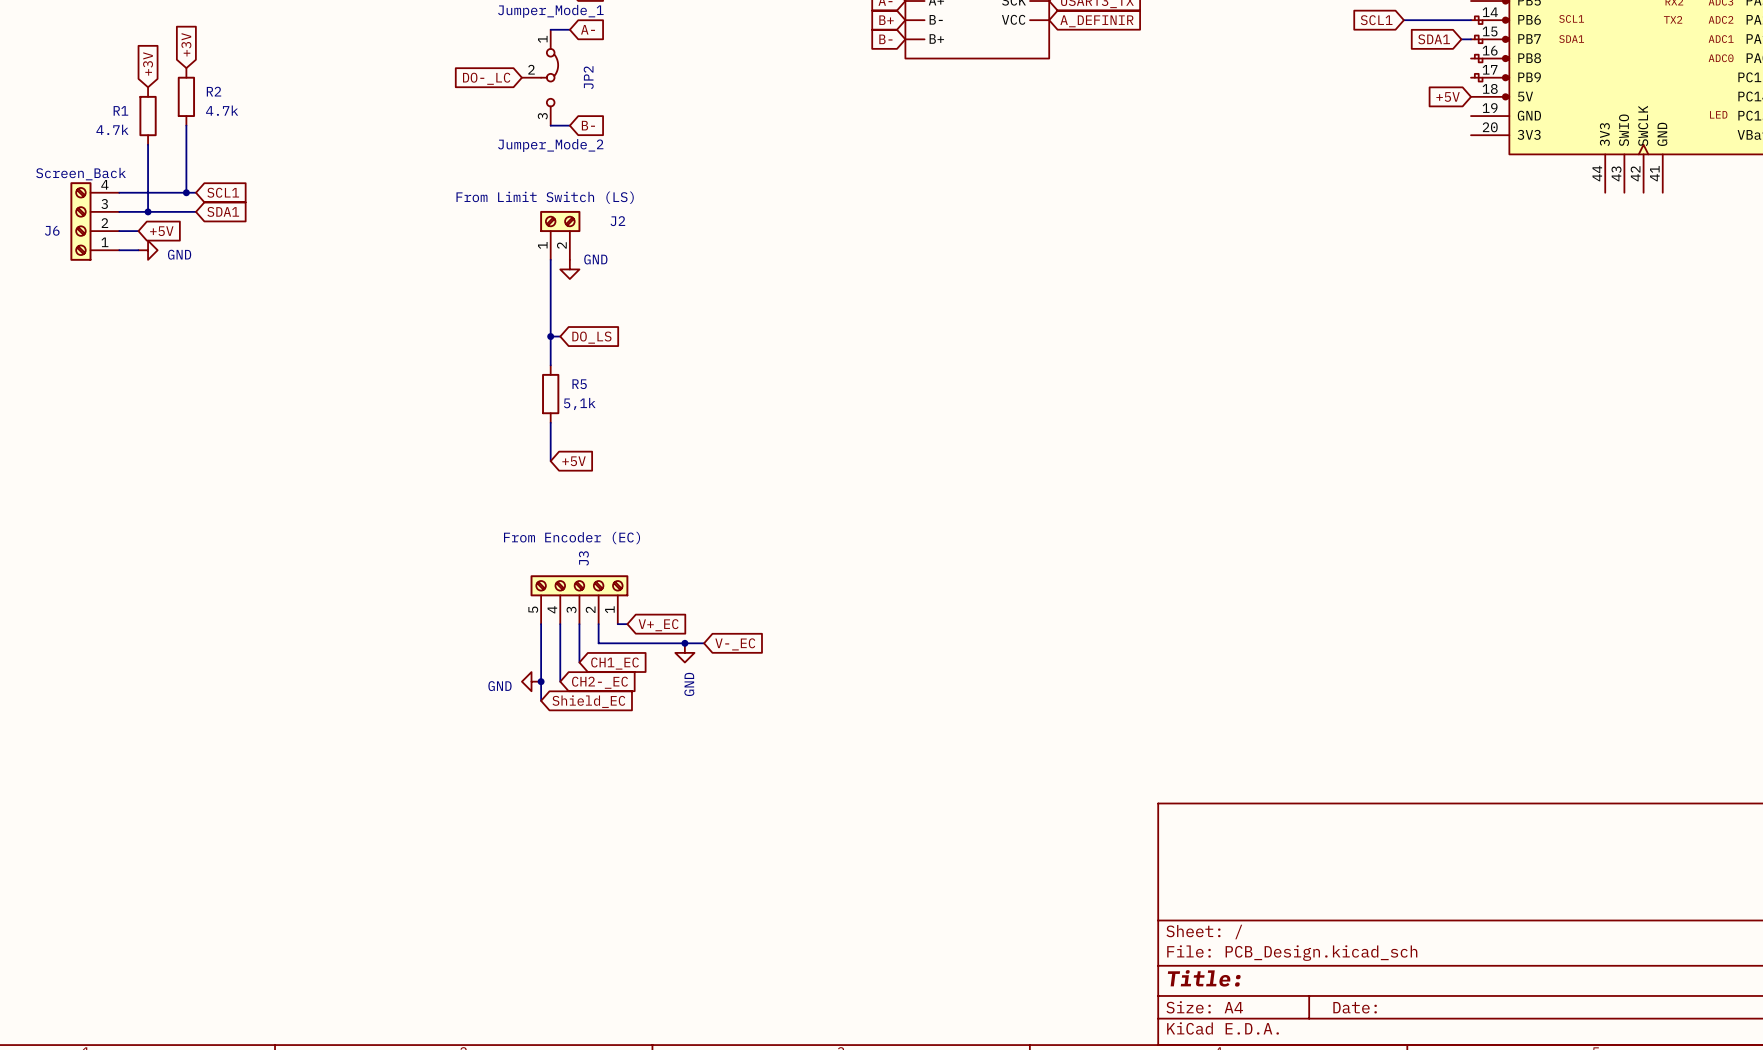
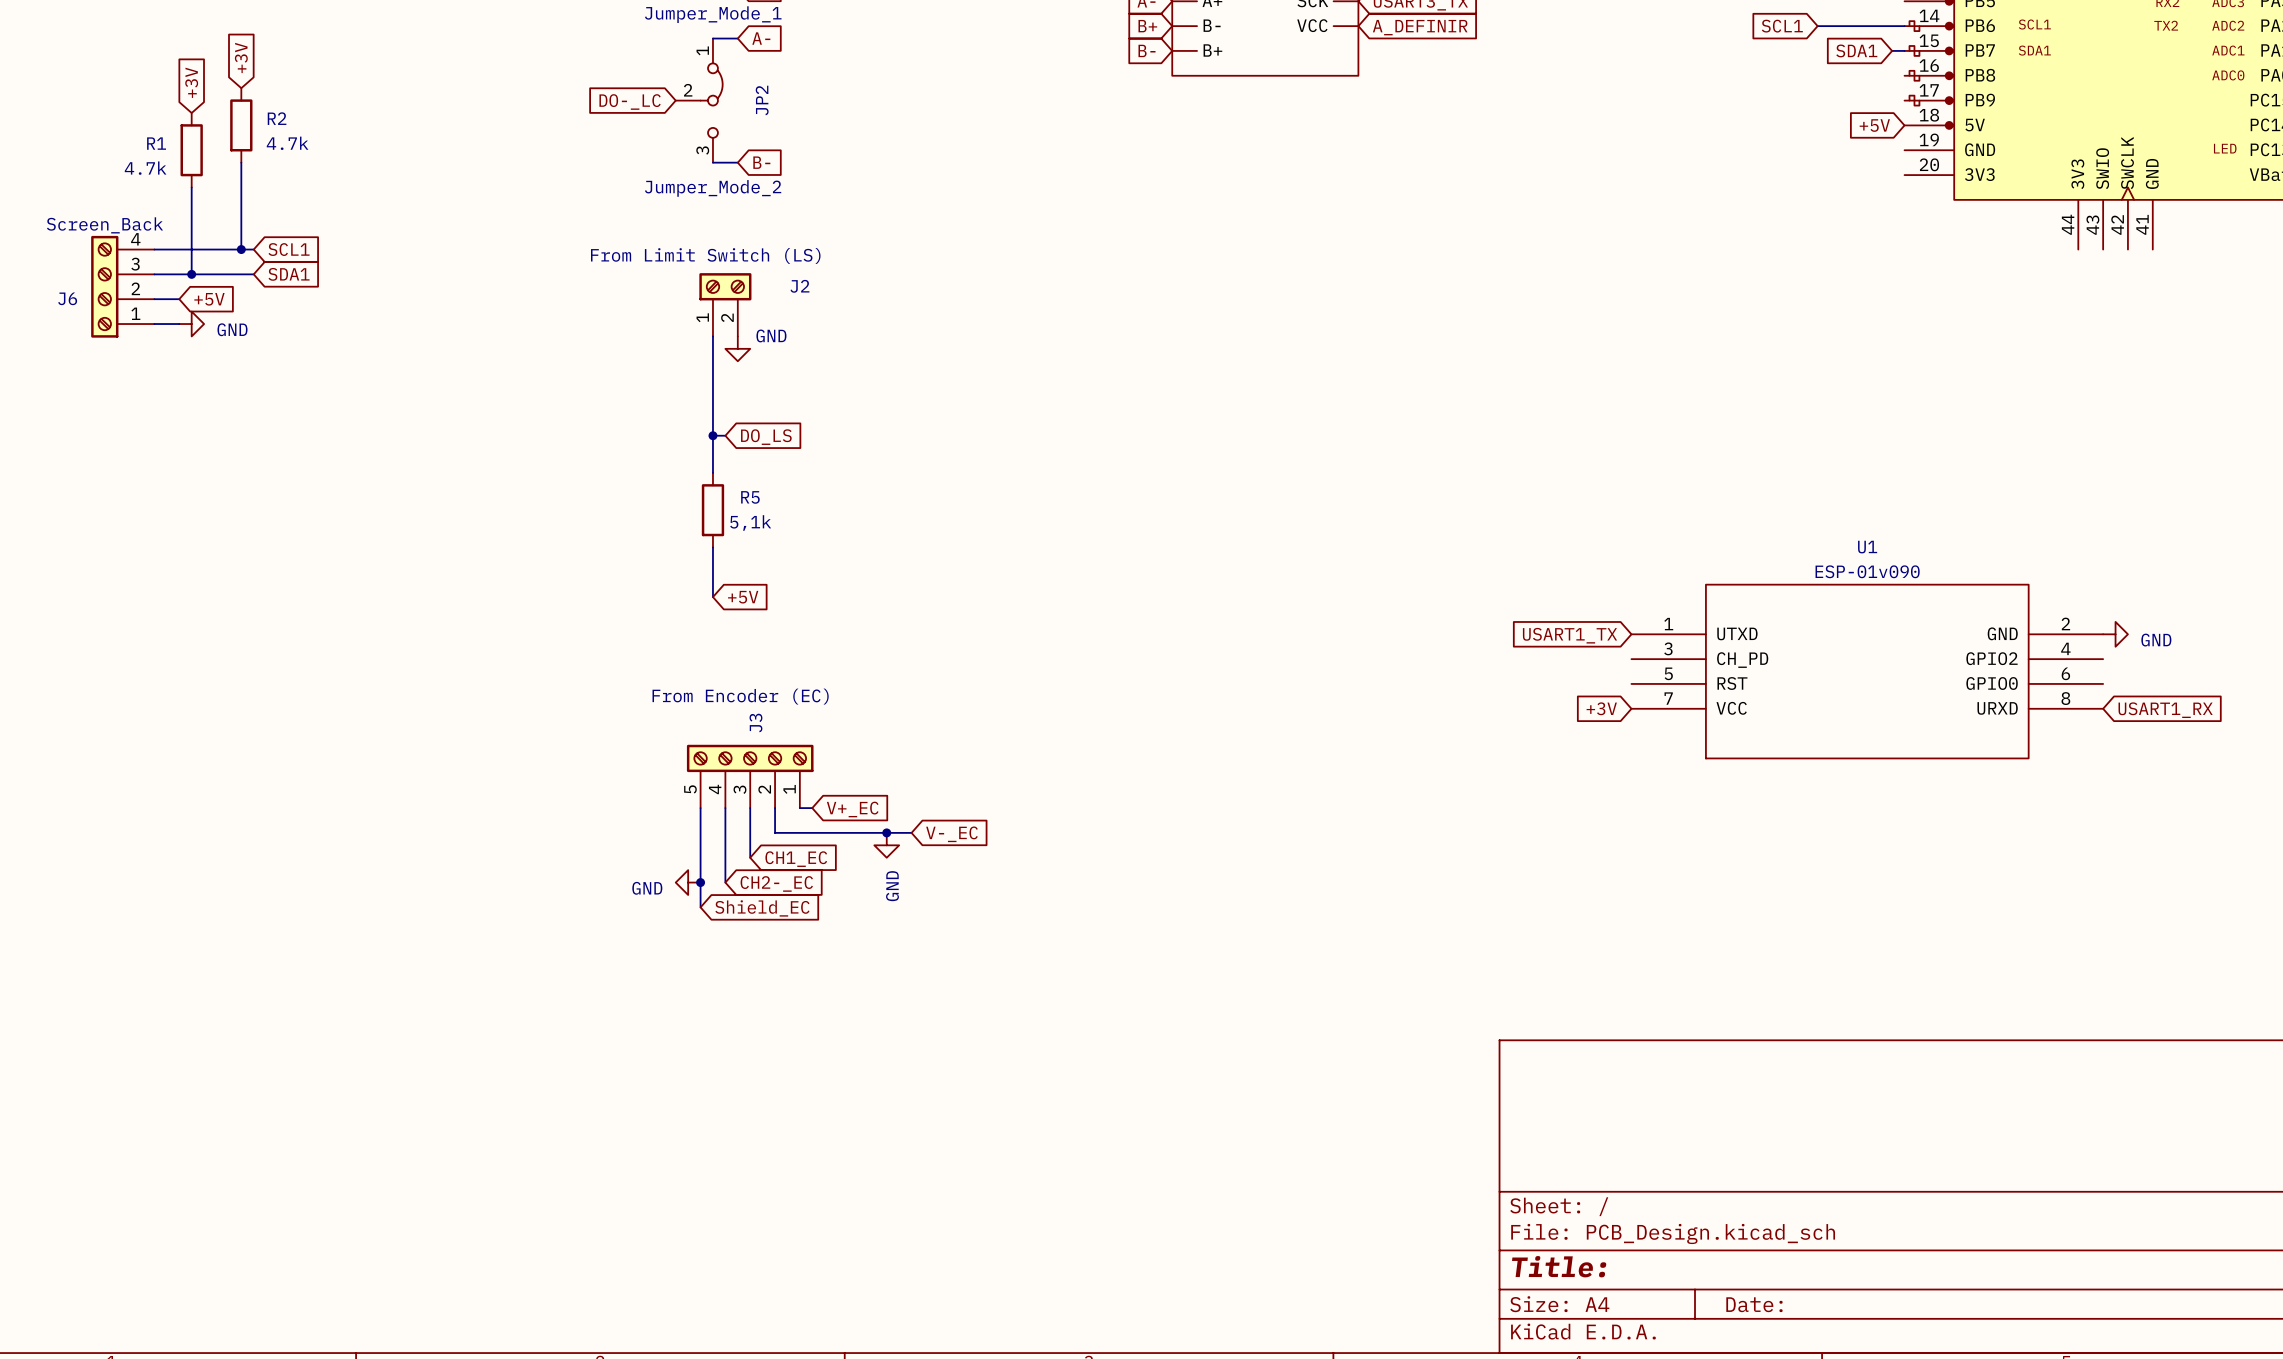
power symbol: none -> GND (2115, 634)
global label: none -> USART1_TX (1569, 635)
U1: none -> ESP-01v090 (1867, 671)
global label: none -> +3V (1601, 708)
global label: none -> USART1_RX (2165, 710)

